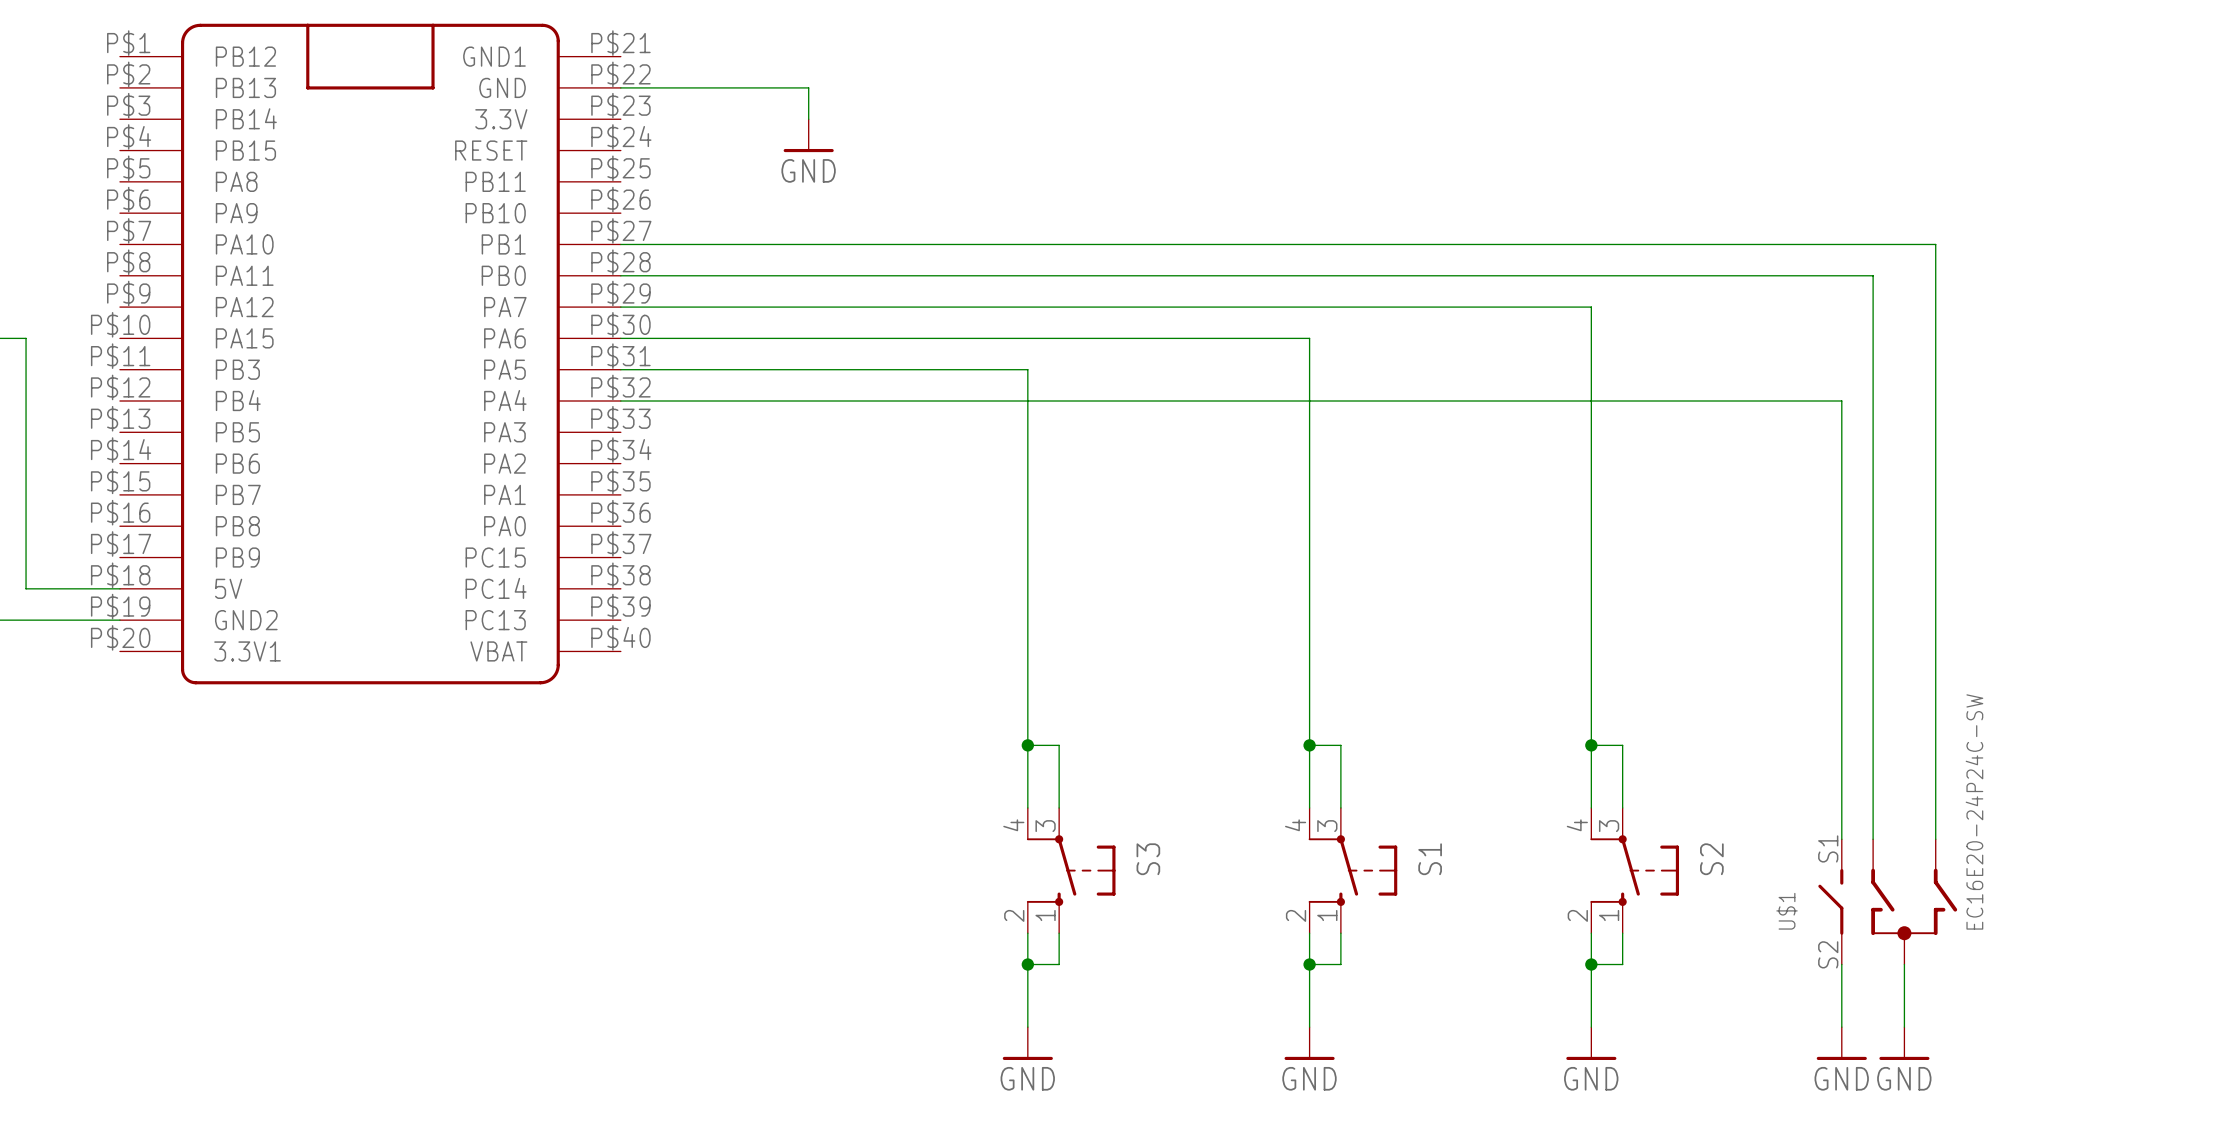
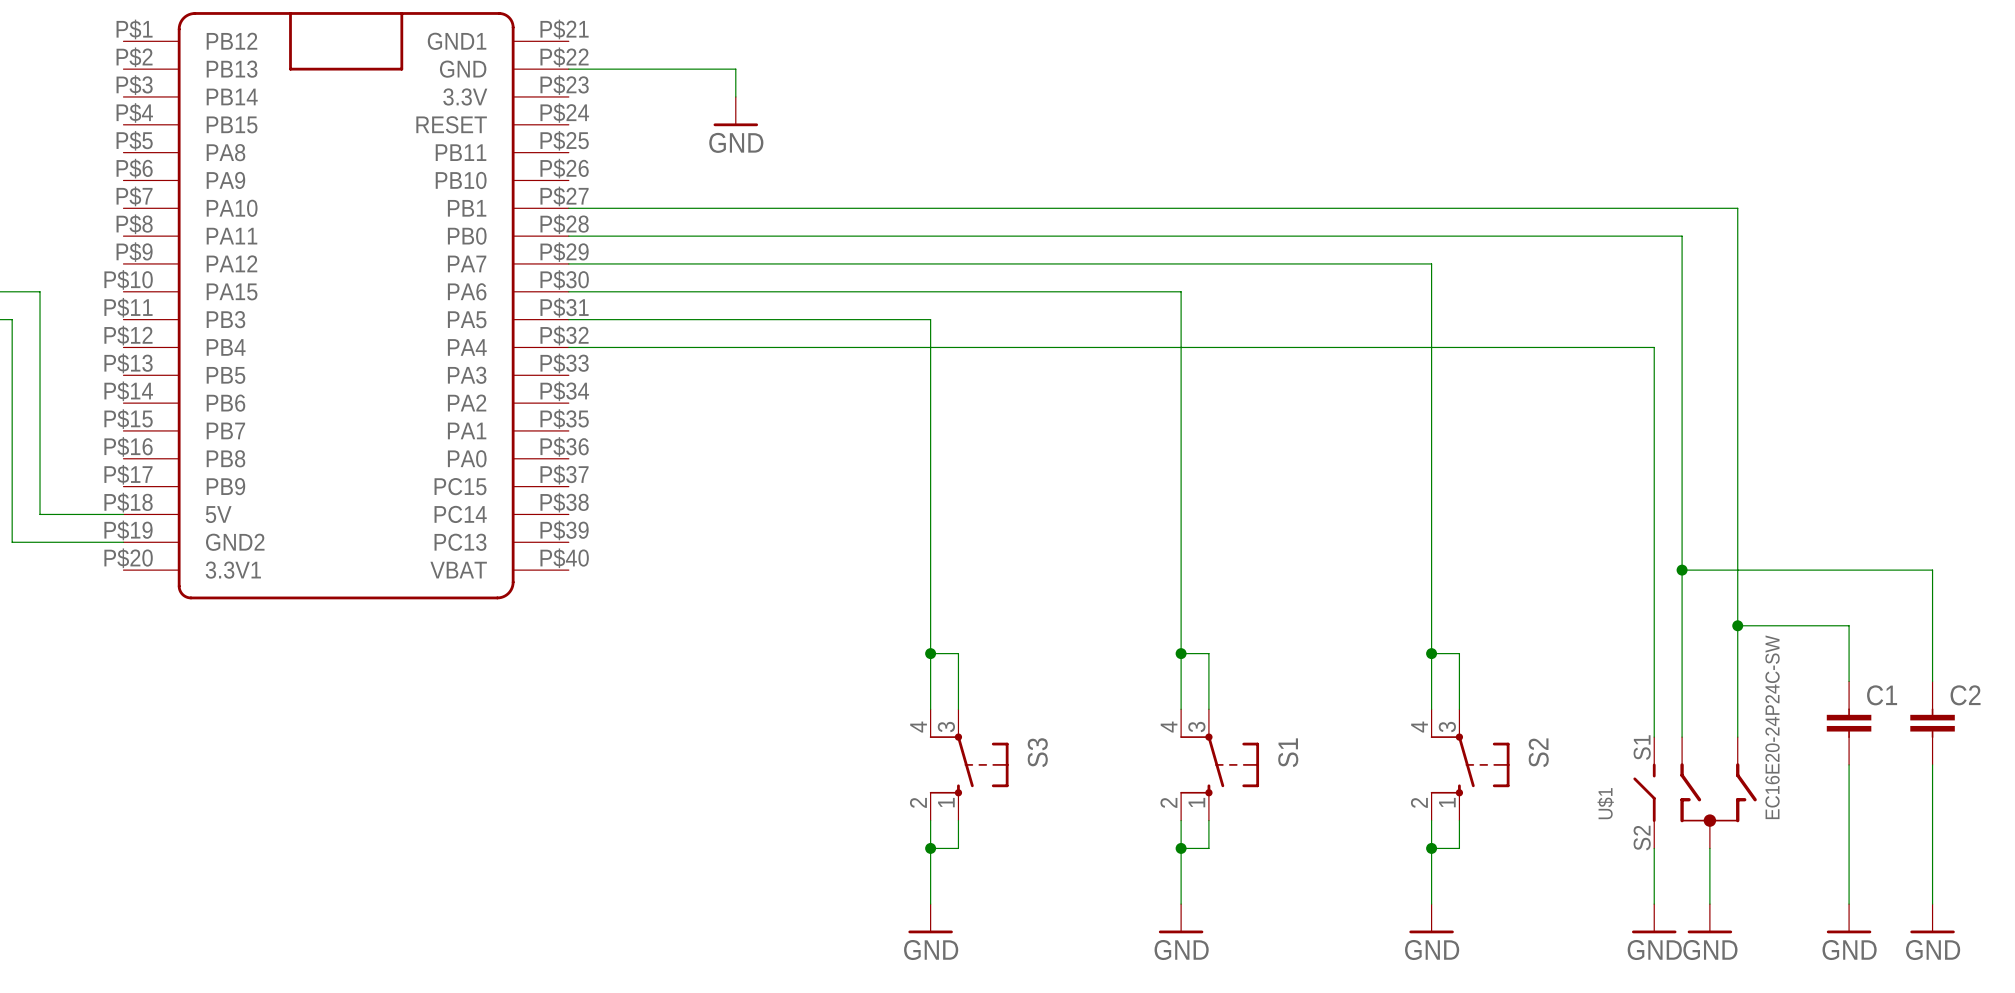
wire: none -> (1682, 570) (1932, 570) (1932, 681)
junction: none -> (1682, 570)
wire: none -> (1737, 625) (1849, 625) (1849, 681)
junction: none -> (1737, 625)
C1: none -> (1849, 723)
C2: none -> (1932, 723)
wire: none -> (1849, 764) (1849, 904)
wire: none -> (1932, 764) (1932, 904)
power symbol: none -> GND (1849, 918)
power symbol: none -> GND (1932, 918)

